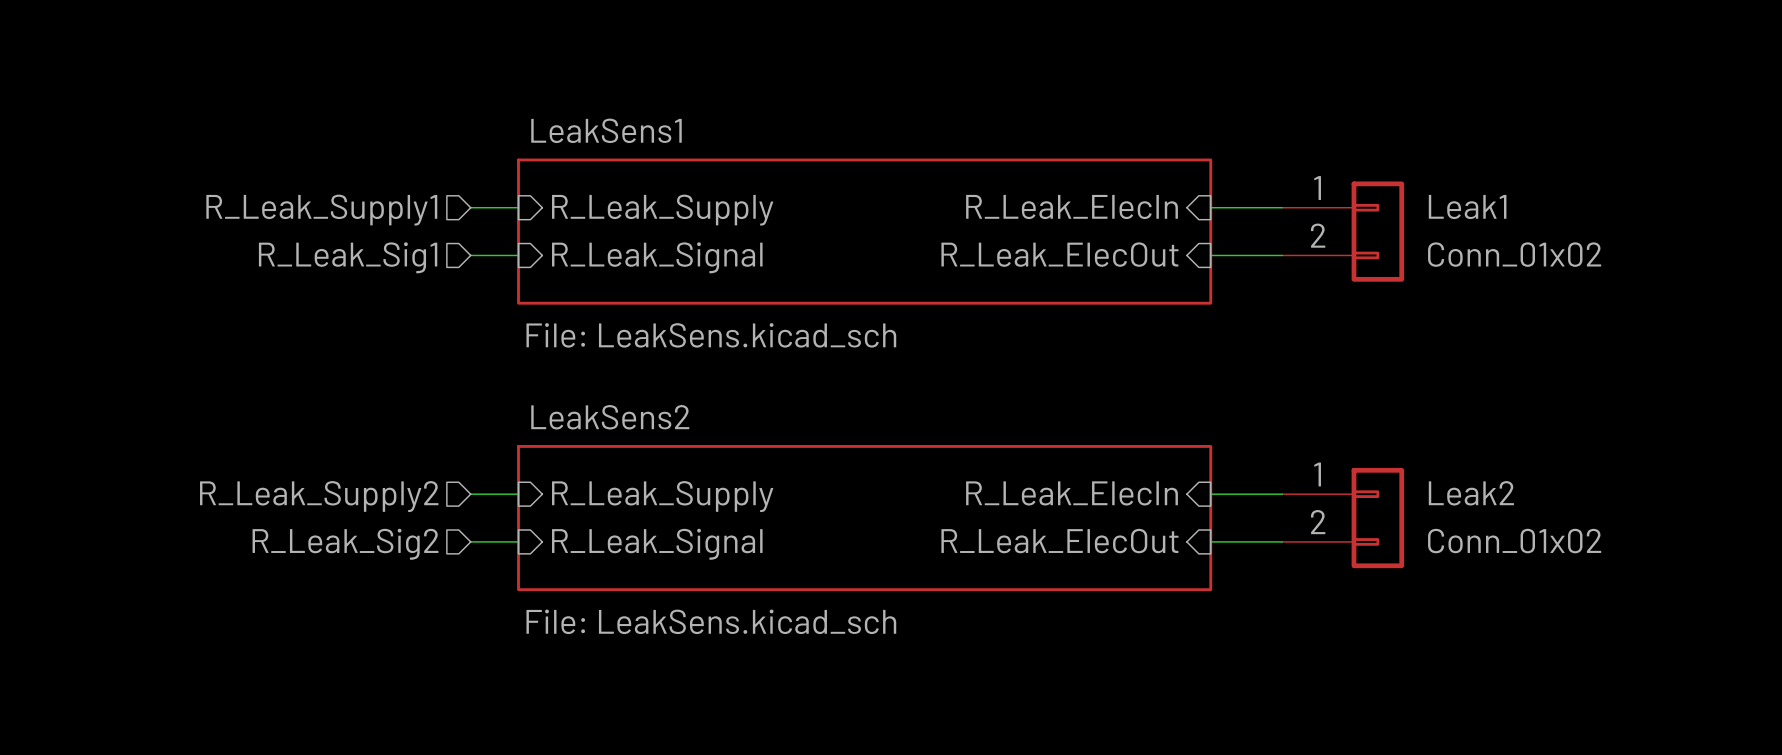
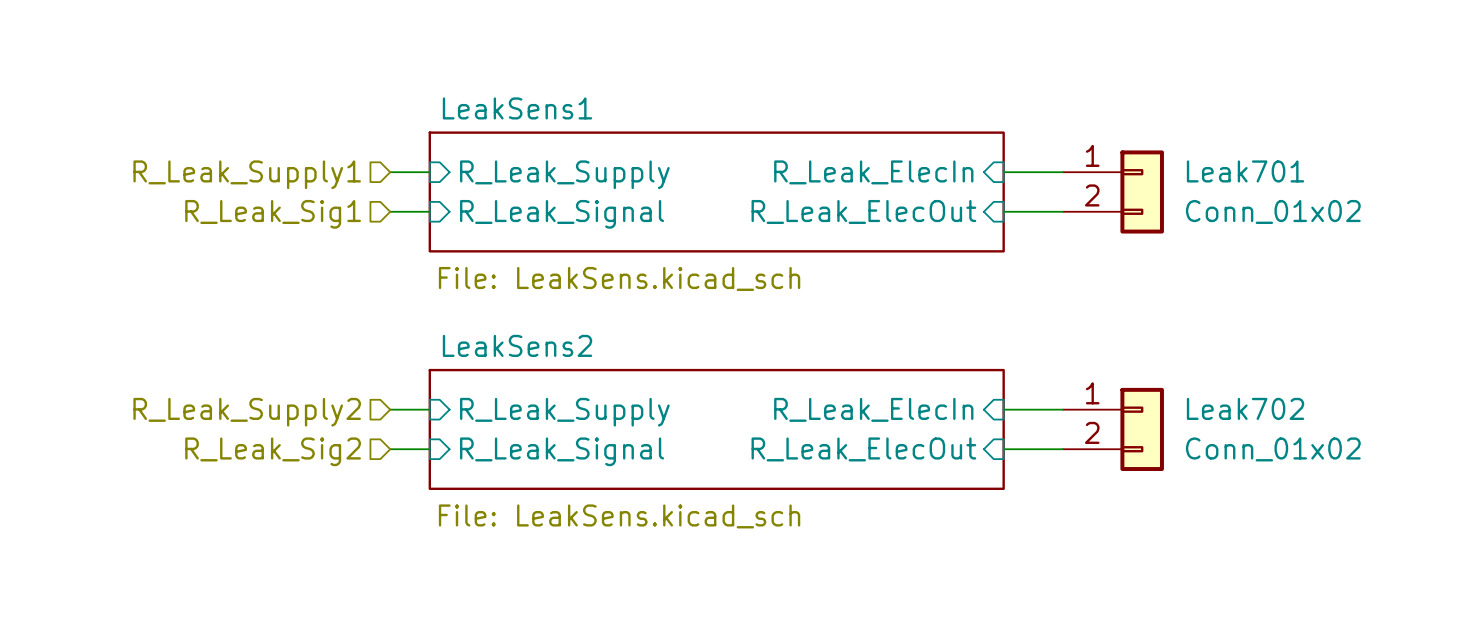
Leak1 name: Leak1 (1467, 206) -> Leak701 (1245, 171)
Leak2 name: Leak2 (1471, 493) -> Leak702 (1245, 408)

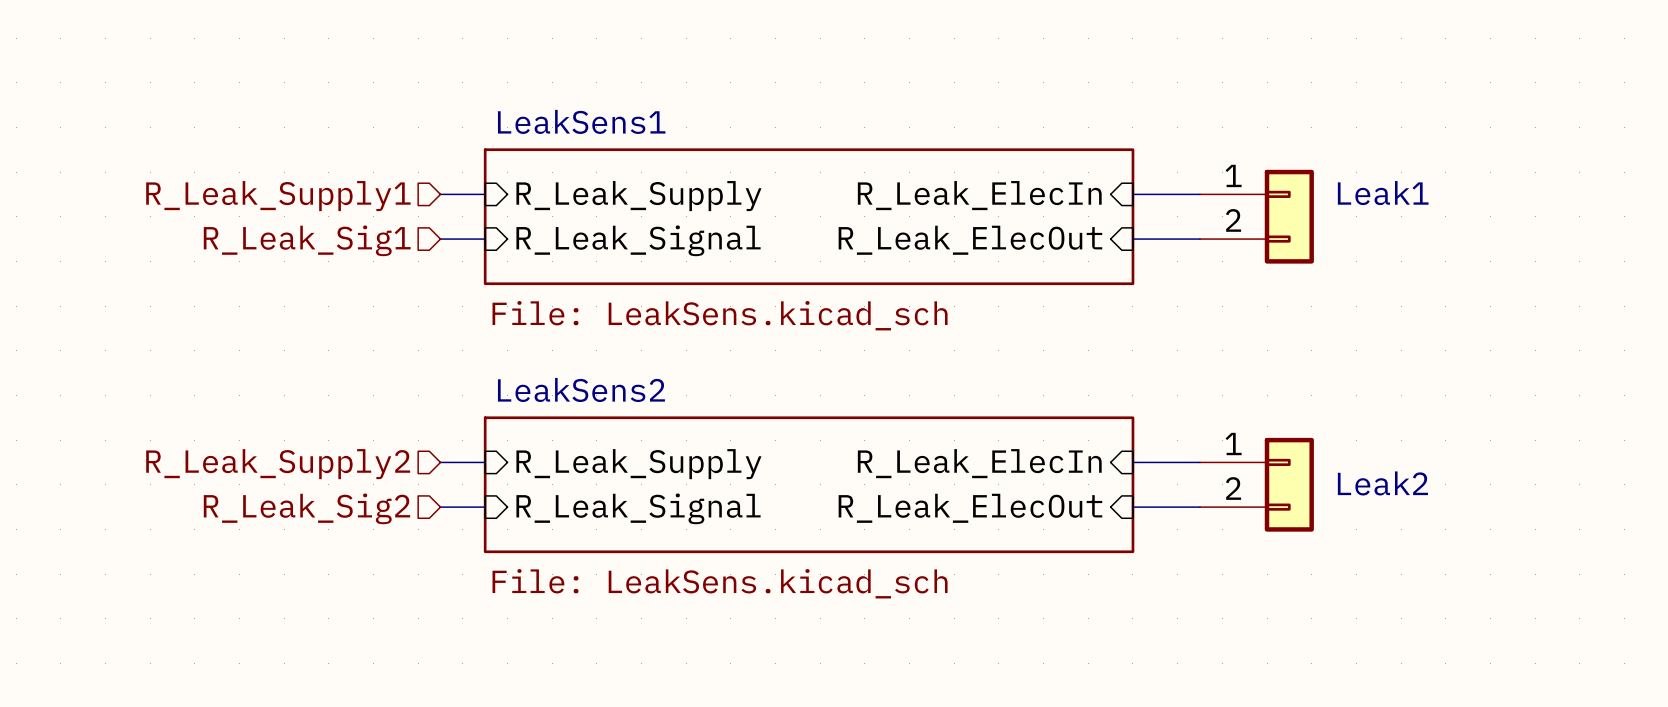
Leak701 name: Leak701 (1245, 171) -> Leak1 (1383, 193)
Leak701 value: Conn_01x02 (1273, 211) -> none
Leak702 name: Leak702 (1245, 408) -> Leak2 (1382, 483)
Leak702 value: Conn_01x02 (1273, 449) -> none

